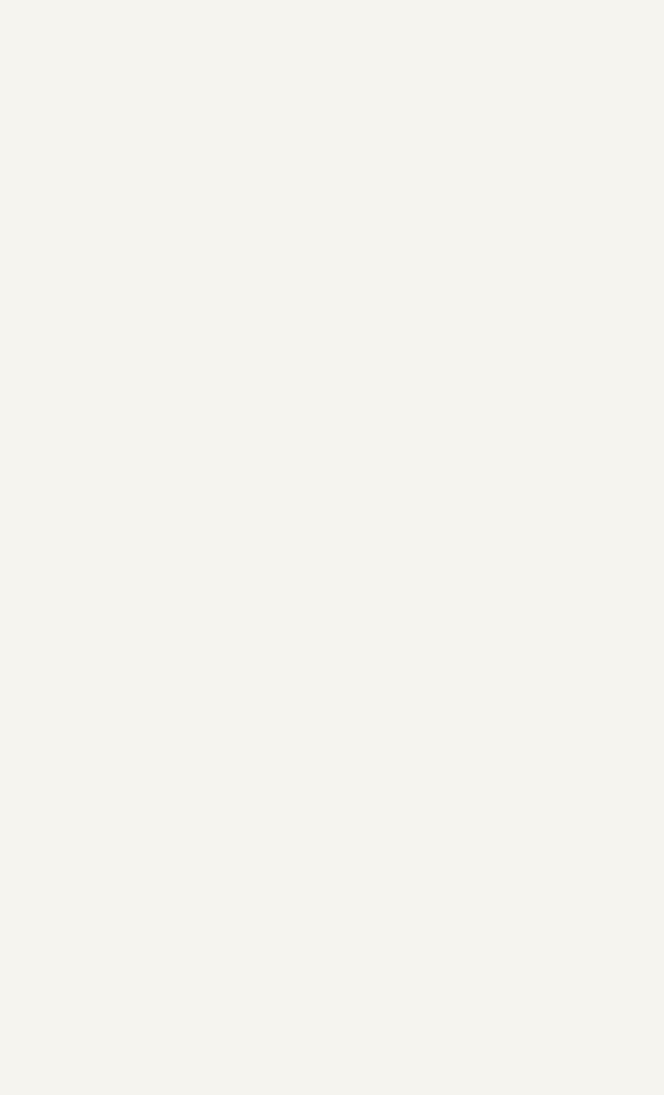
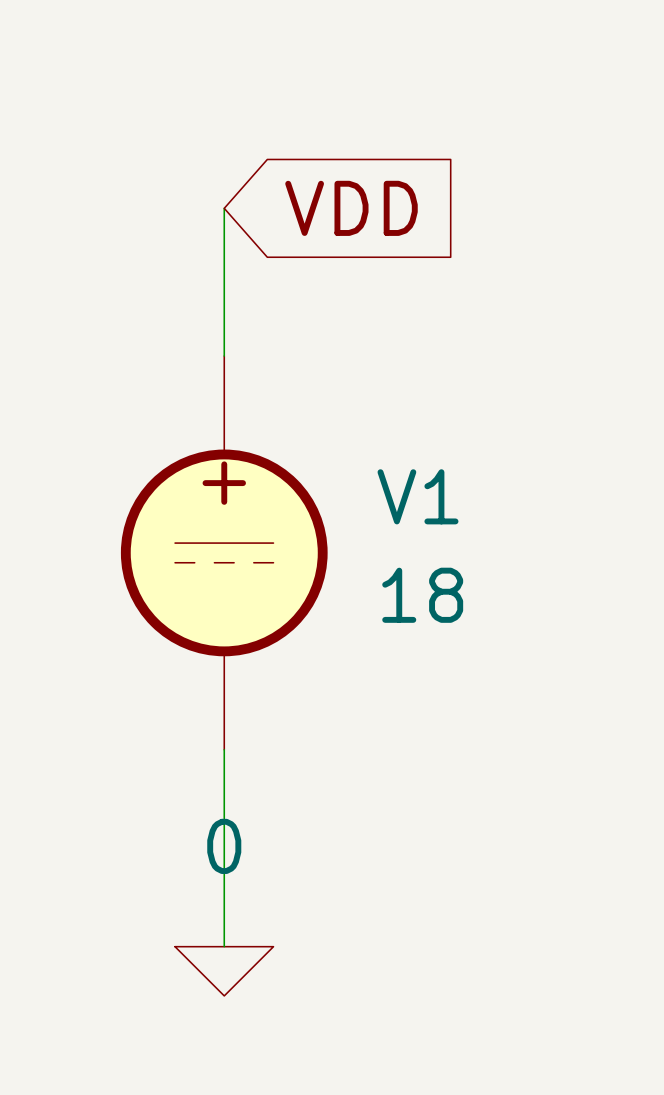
wire: none -> (224, 208) (224, 356)
global label: none -> VDD (351, 208)
V1: none -> 18 (224, 552)
wire: none -> (224, 749) (224, 946)
power symbol: none -> 0 (224, 971)

